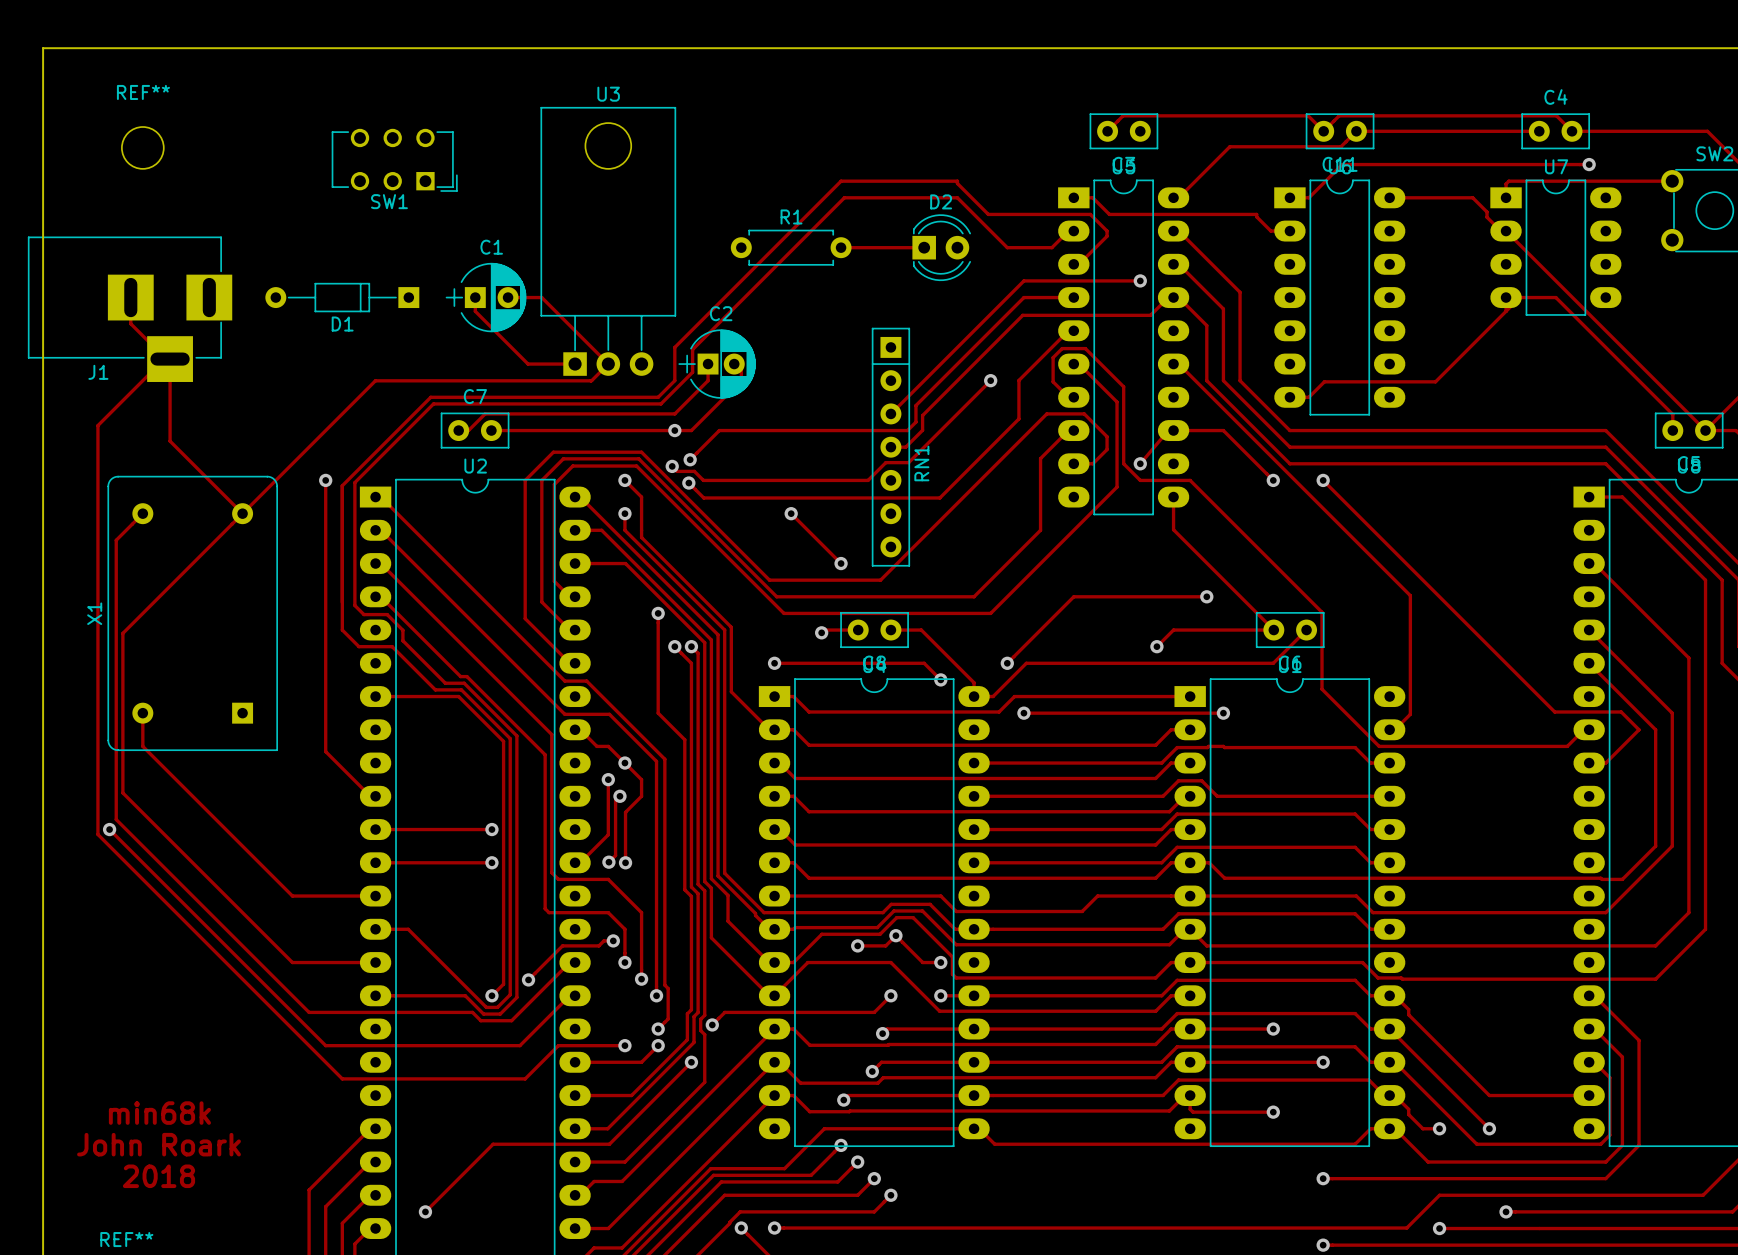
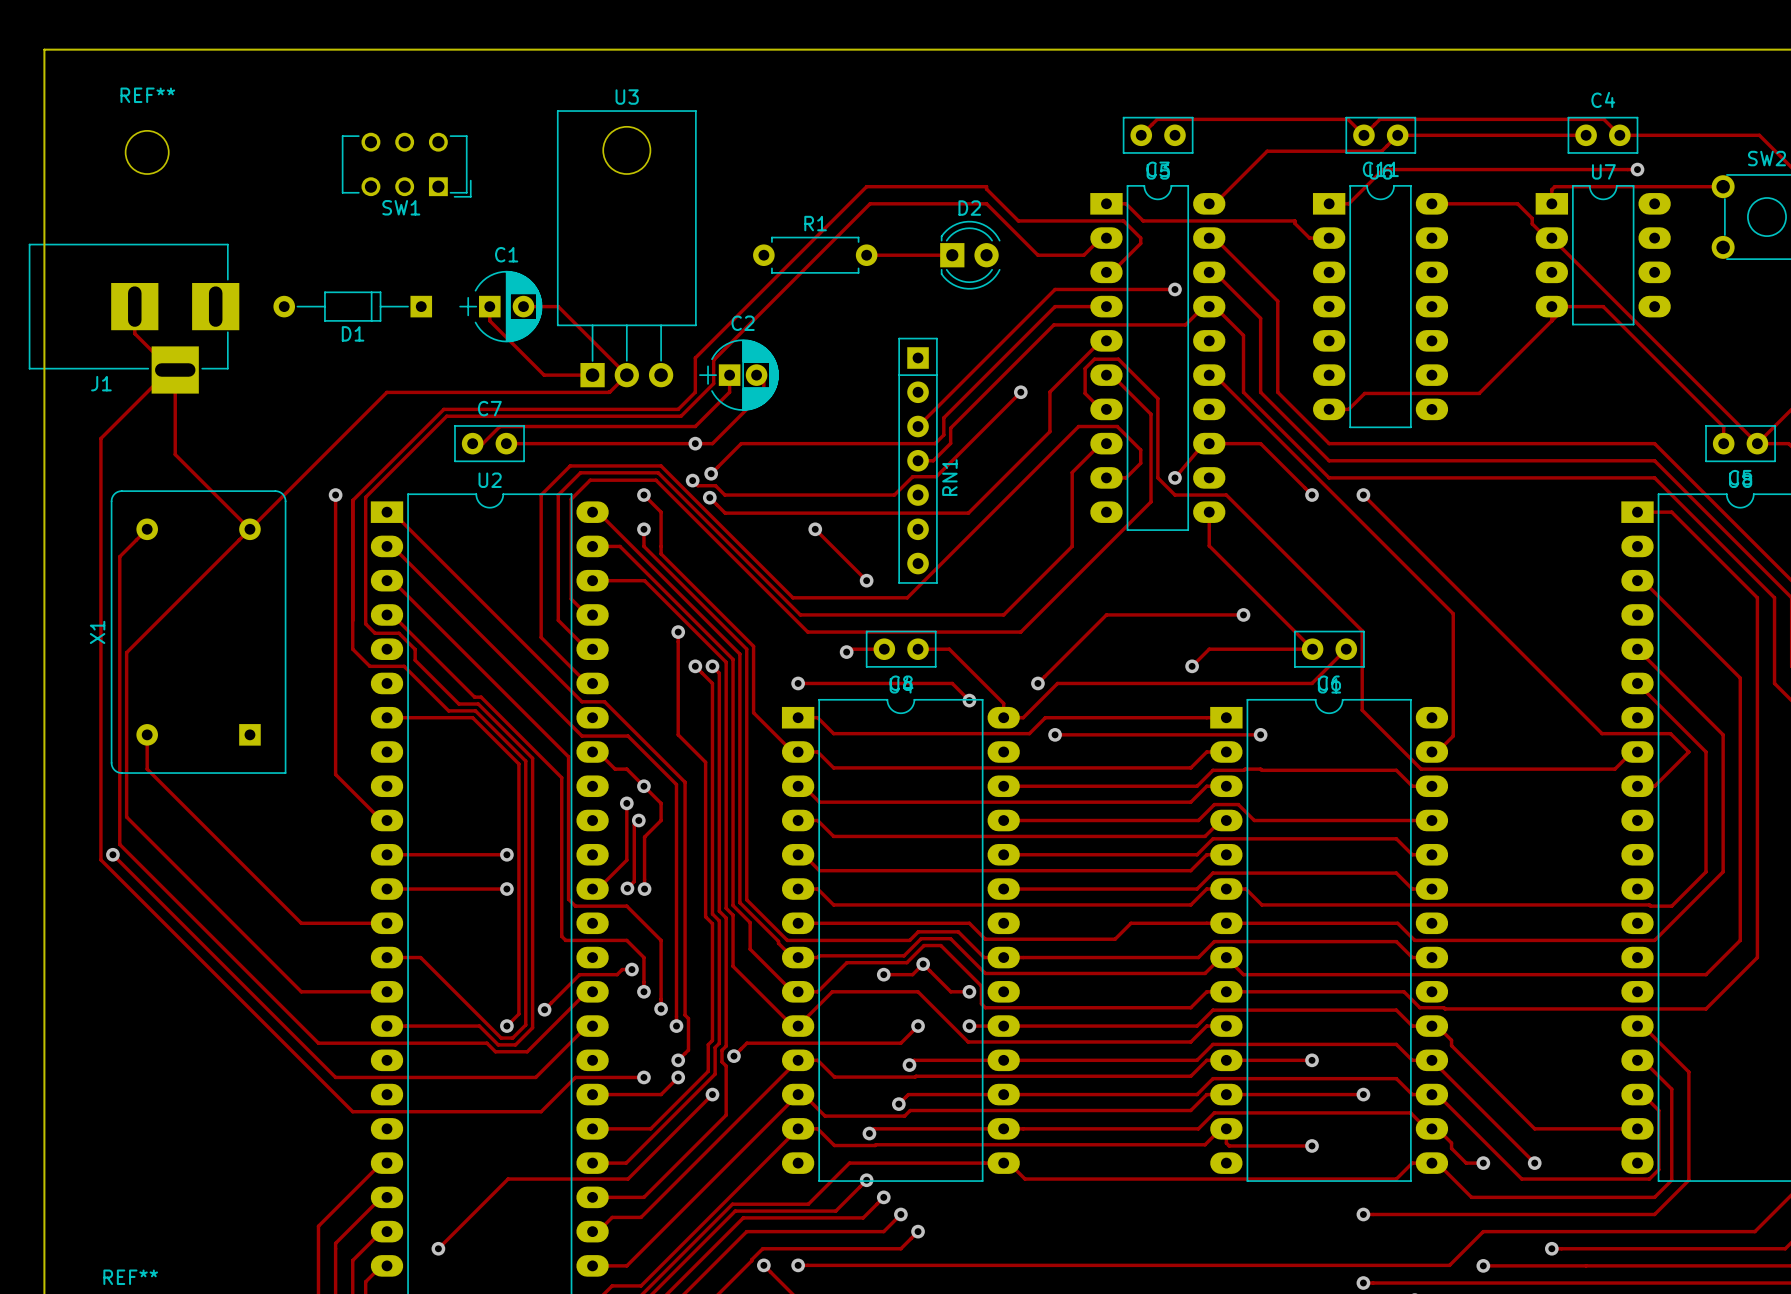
text: min68k (159, 1113) -> none
text: John Roark (158, 1144) -> none
text: 2018 (158, 1176) -> none

